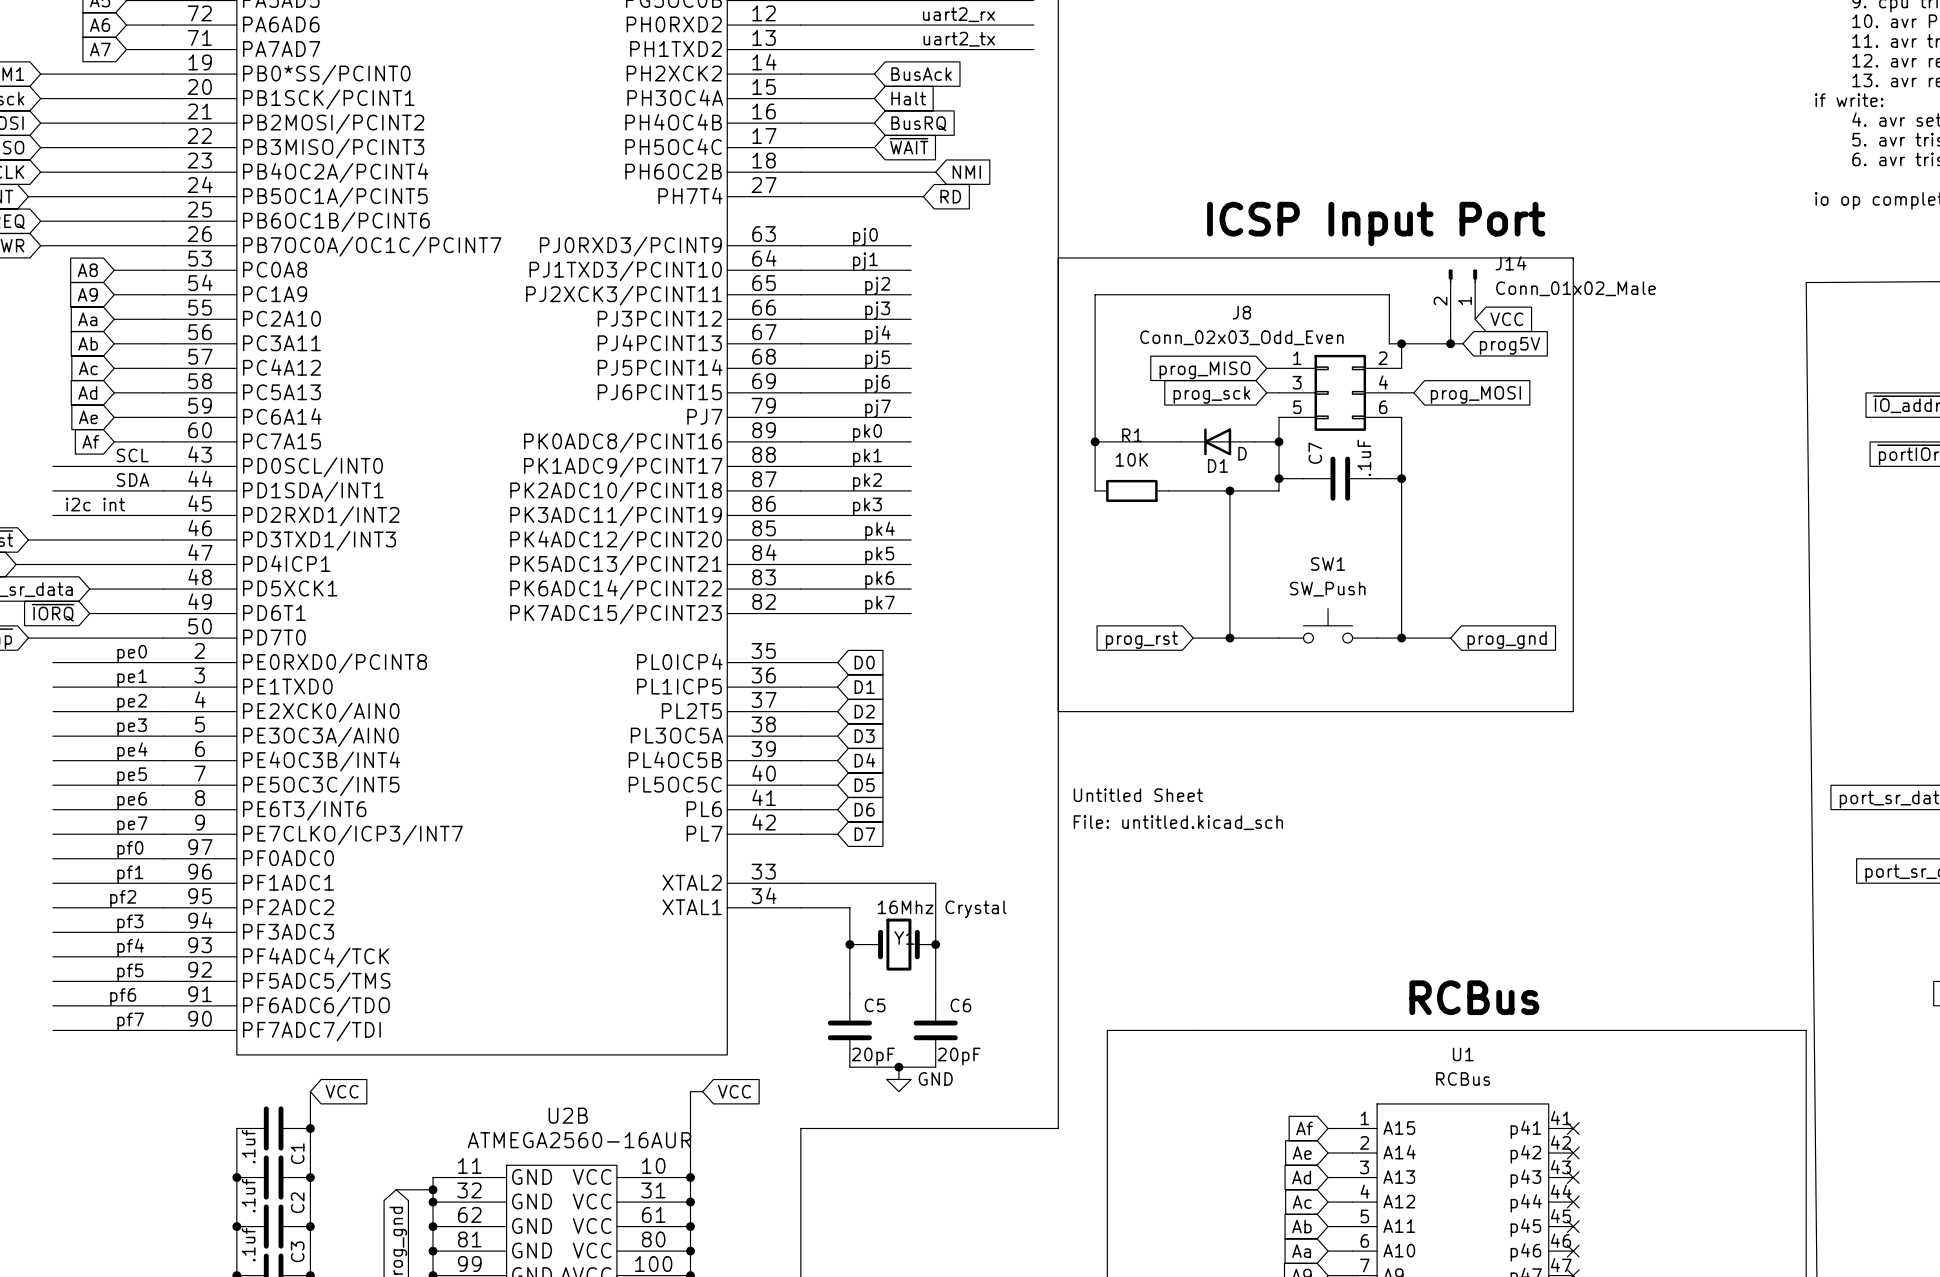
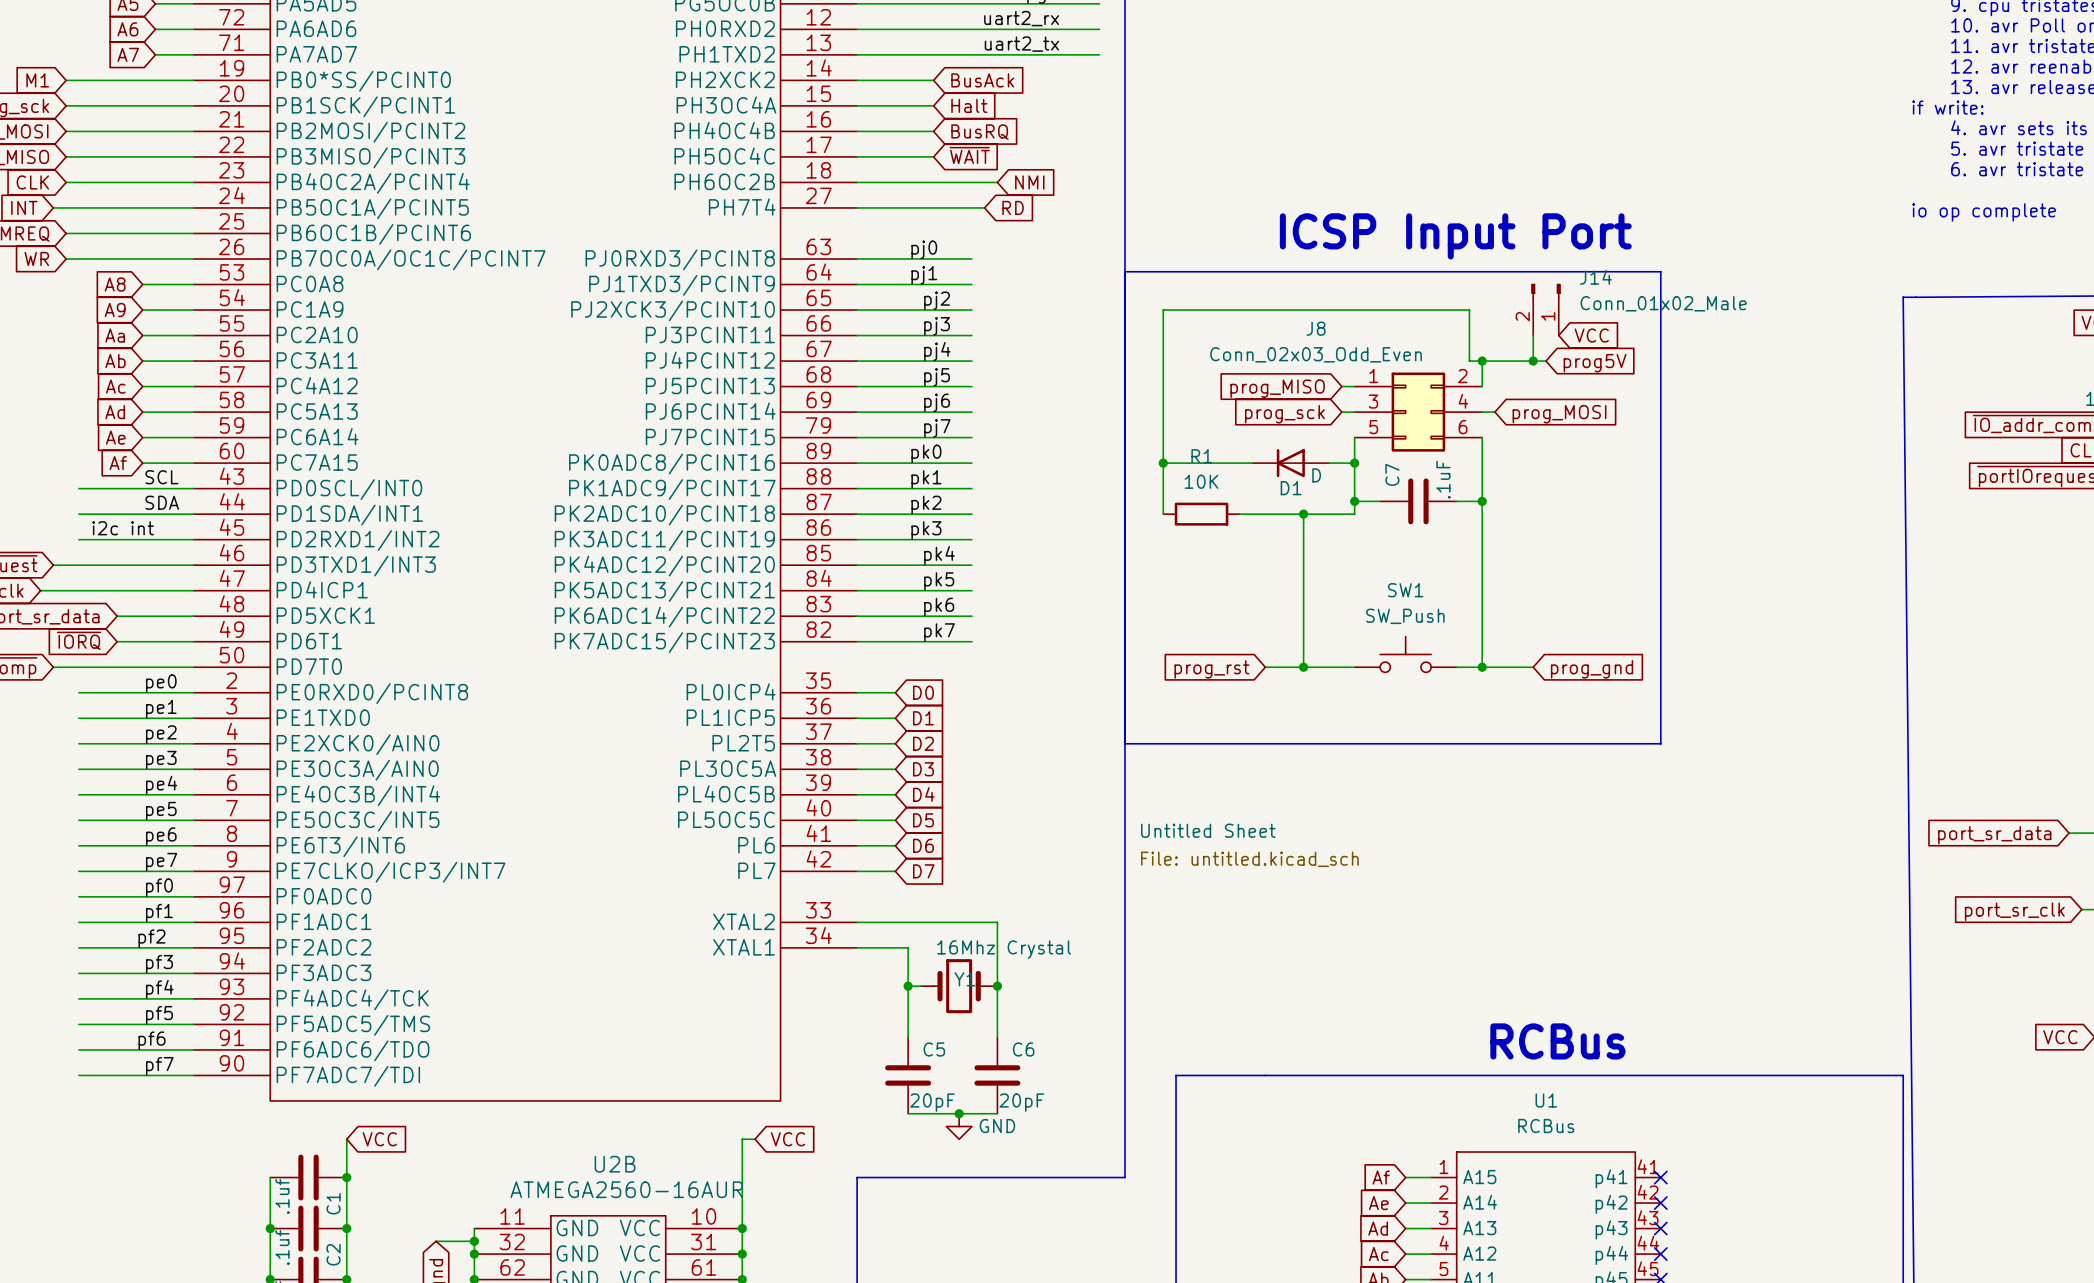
part pin name: PJ0RXD3/PCINT9 (630, 246) -> PJ0RXD3/PCINT8 (680, 259)
part pin name: PJ1TXD3/PCINT10 (625, 271) -> PJ1TXD3/PCINT9 (682, 285)
part pin name: PJ2XCK3/PCINT11 (623, 295) -> PJ2XCK3/PCINT10 (673, 310)
part pin name: PJ3PCINT12 (659, 318) -> PJ3PCINT11 (710, 334)
part pin name: PJ4PCINT13 (659, 342) -> PJ4PCINT12 (710, 360)
part pin name: PJ5PCINT14 (660, 367) -> PJ5PCINT13 (710, 386)
part pin name: PJ6PCINT15 (659, 392) -> PJ6PCINT14 (710, 411)
part pin name: PJ7 (704, 416) -> PJ7PCINT15 (710, 437)

